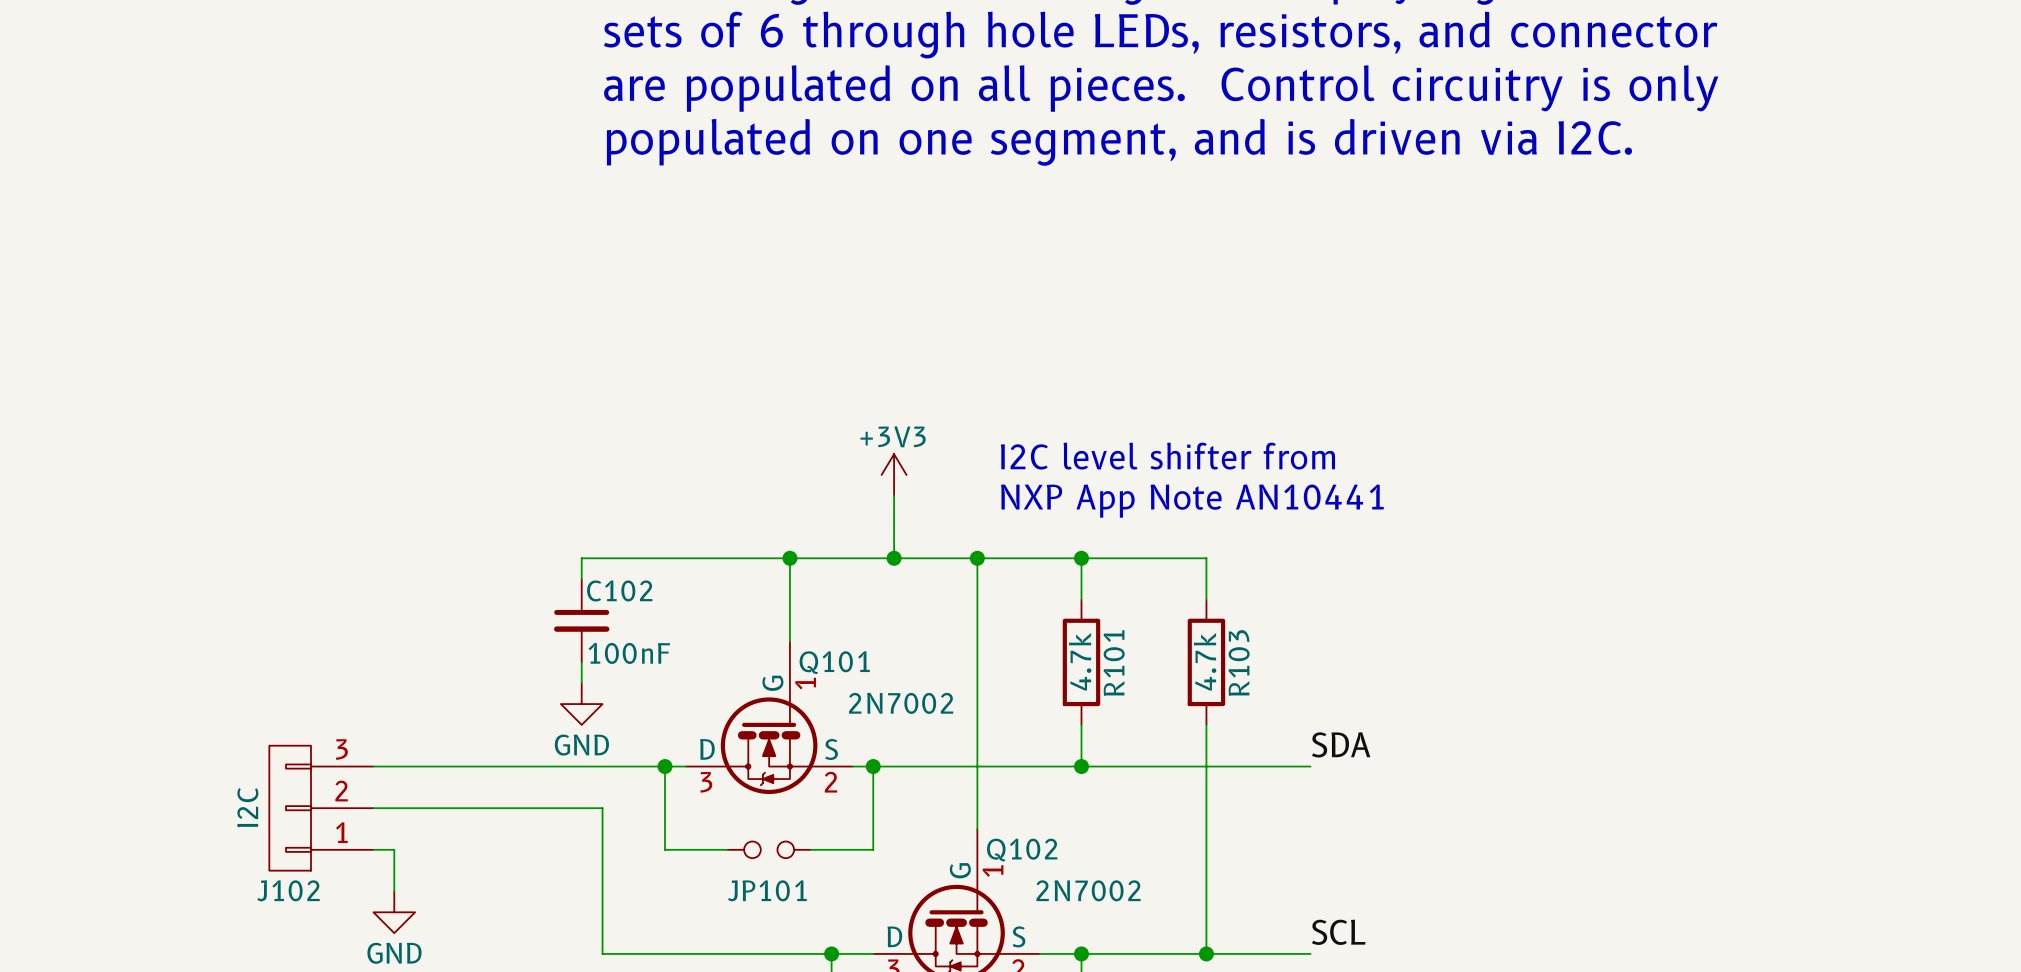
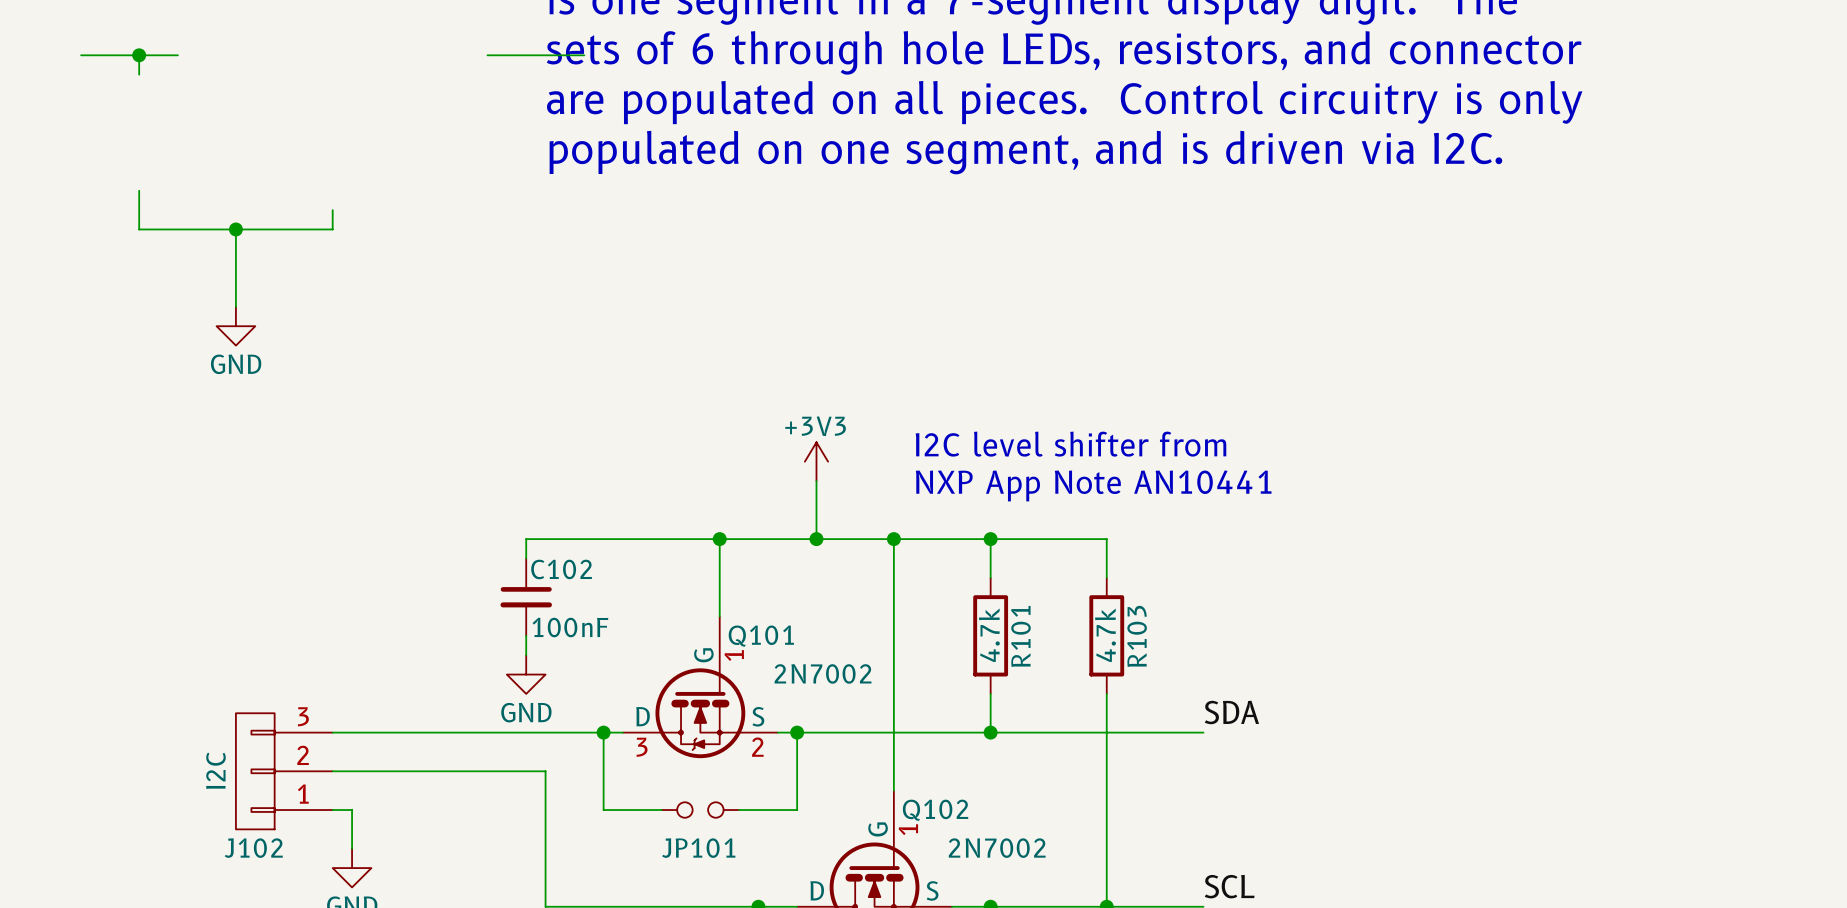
wire: none -> (81, 55) (177, 55)
wire: none -> (139, 55) (139, 74)
junction: none -> (139, 55)
wire: none -> (487, 55) (584, 55)
wire: none -> (139, 190) (139, 229) (332, 229) (332, 210)
wire: none -> (235, 229) (235, 306)
junction: none -> (235, 229)
power symbol: none -> GND (235, 326)

